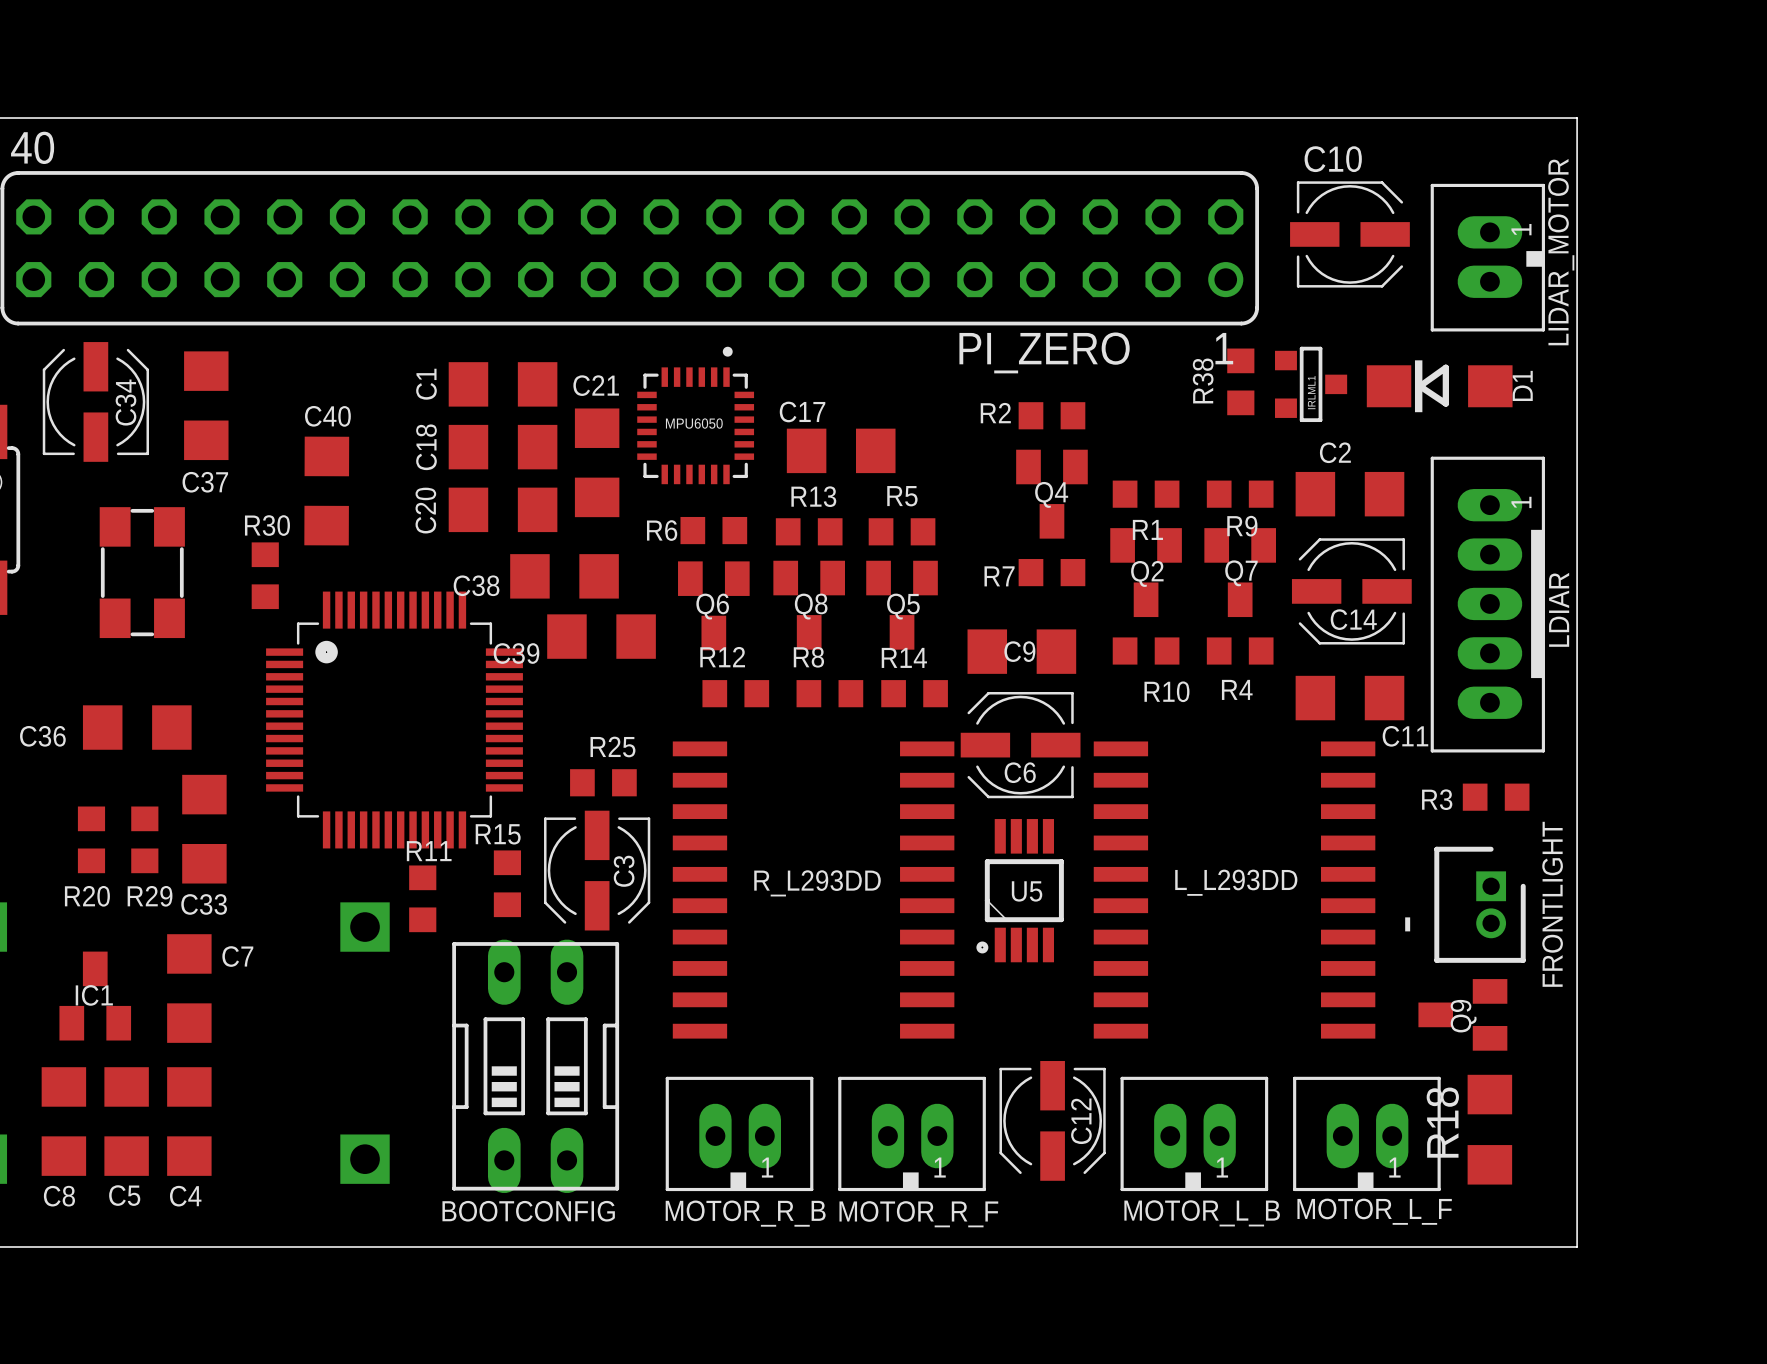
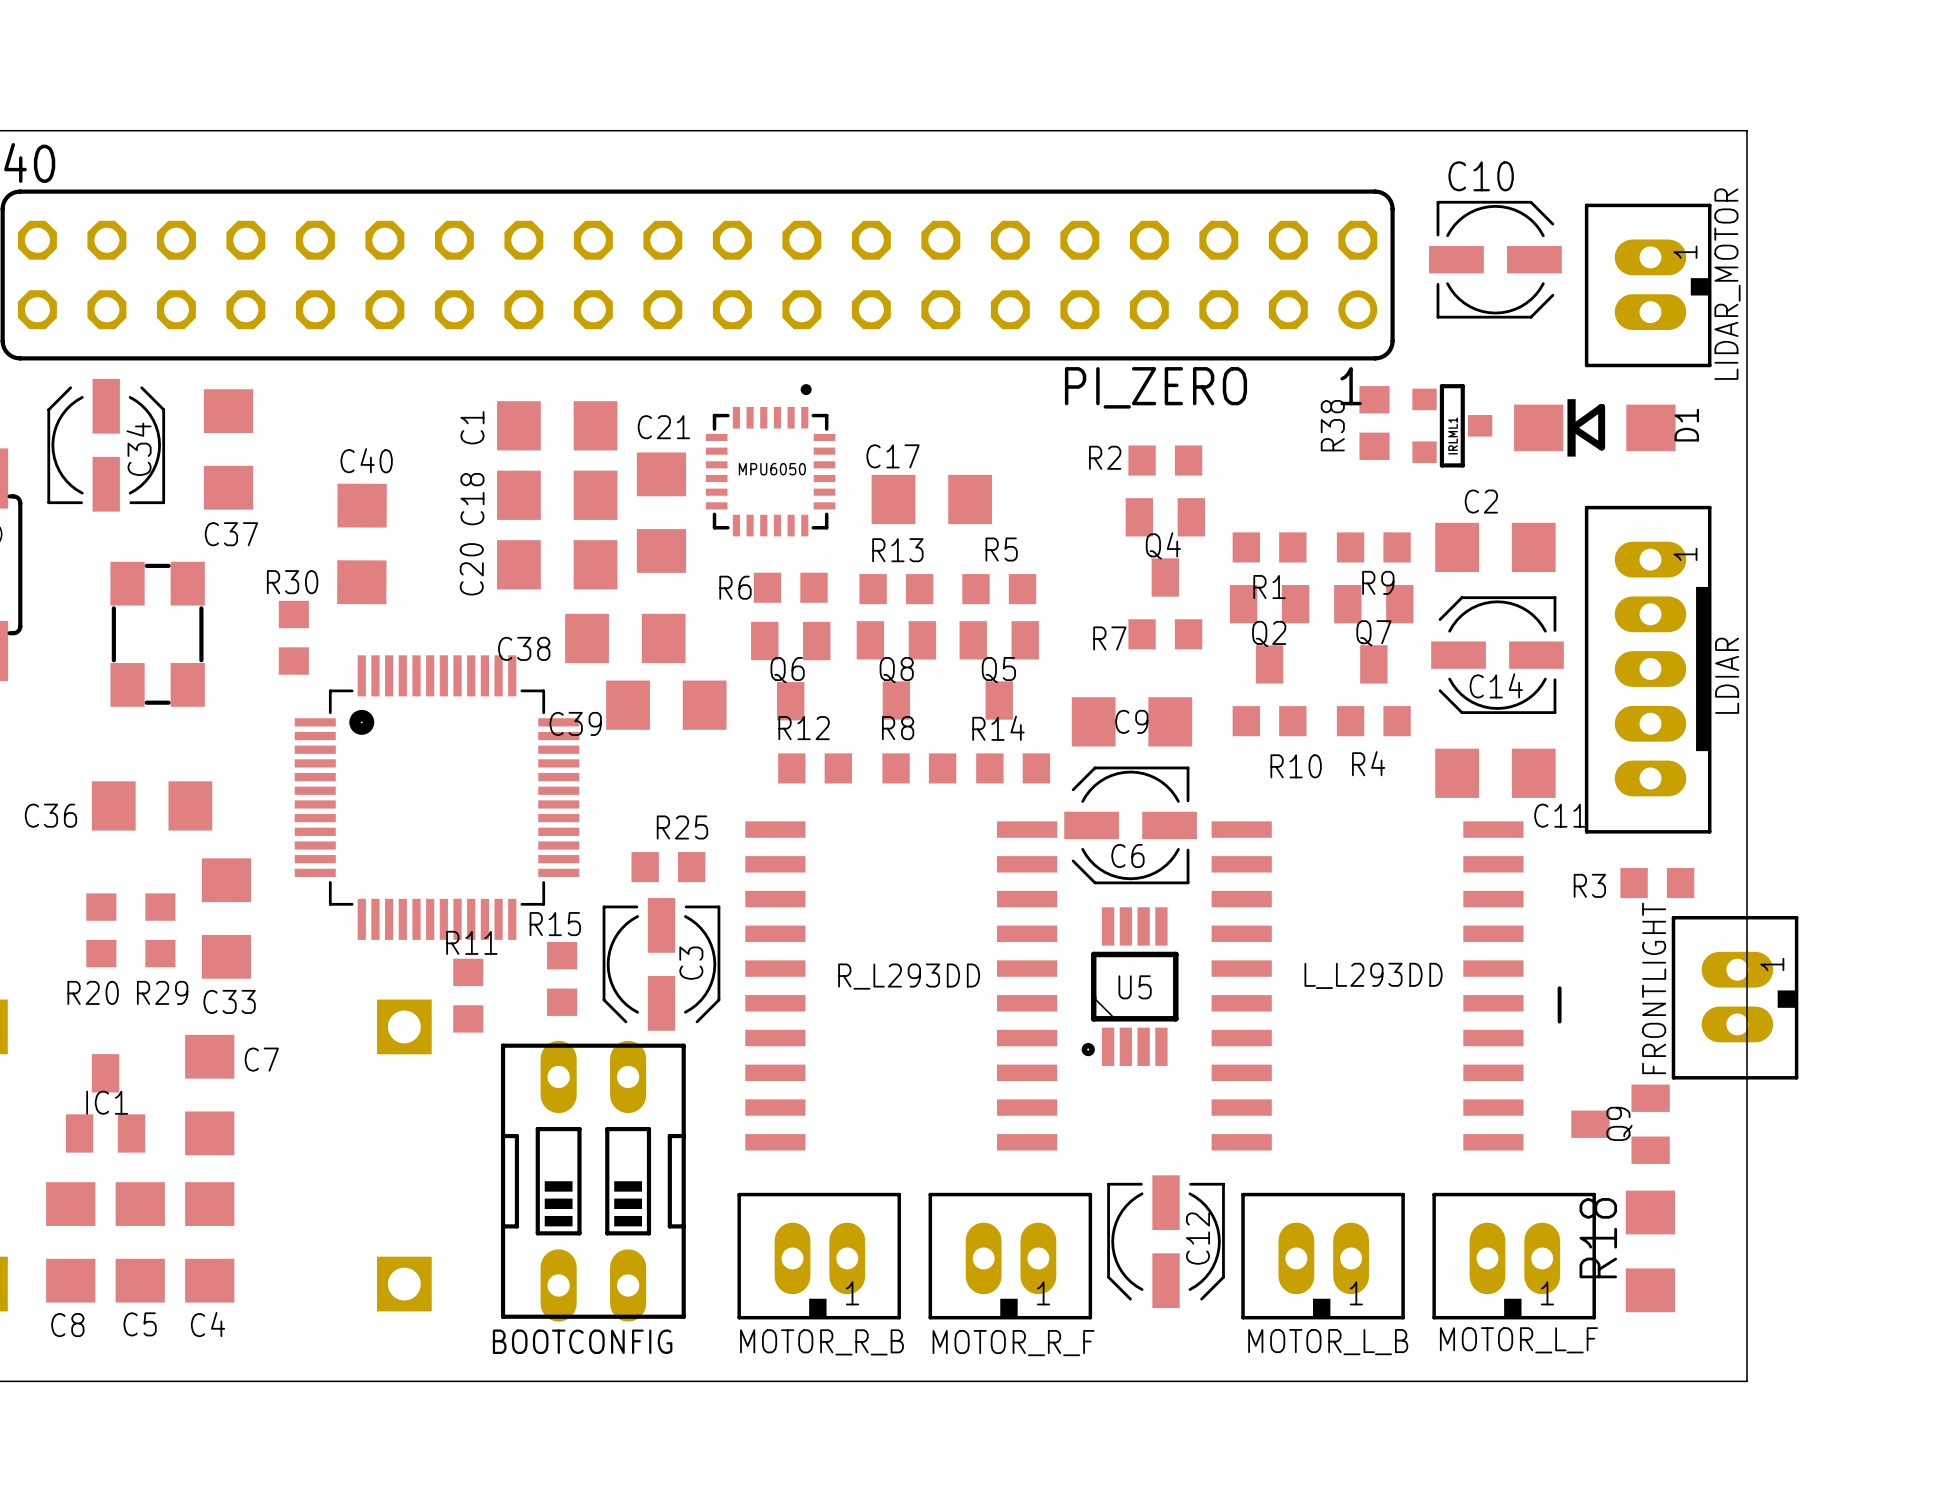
FRONTLIGHT: none -> (1735, 997)
FRONTLIGHT: (1480, 904) -> none

